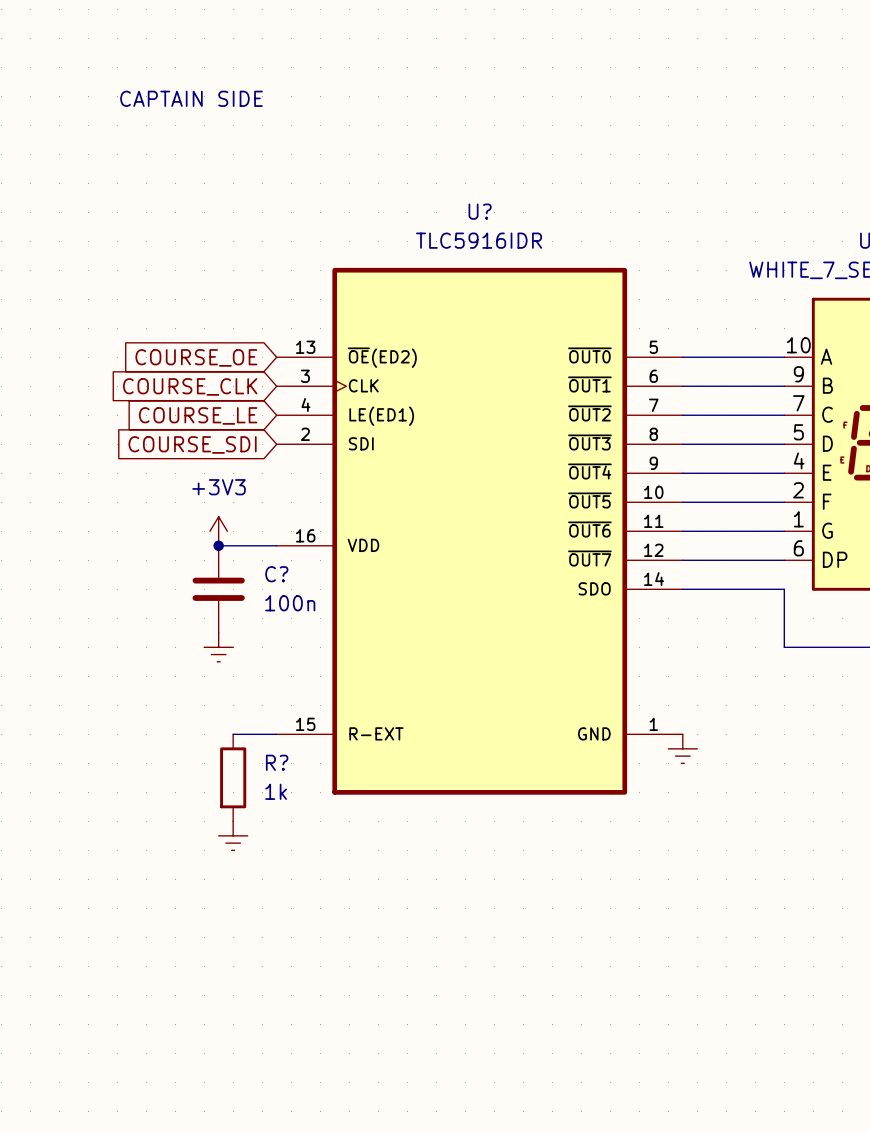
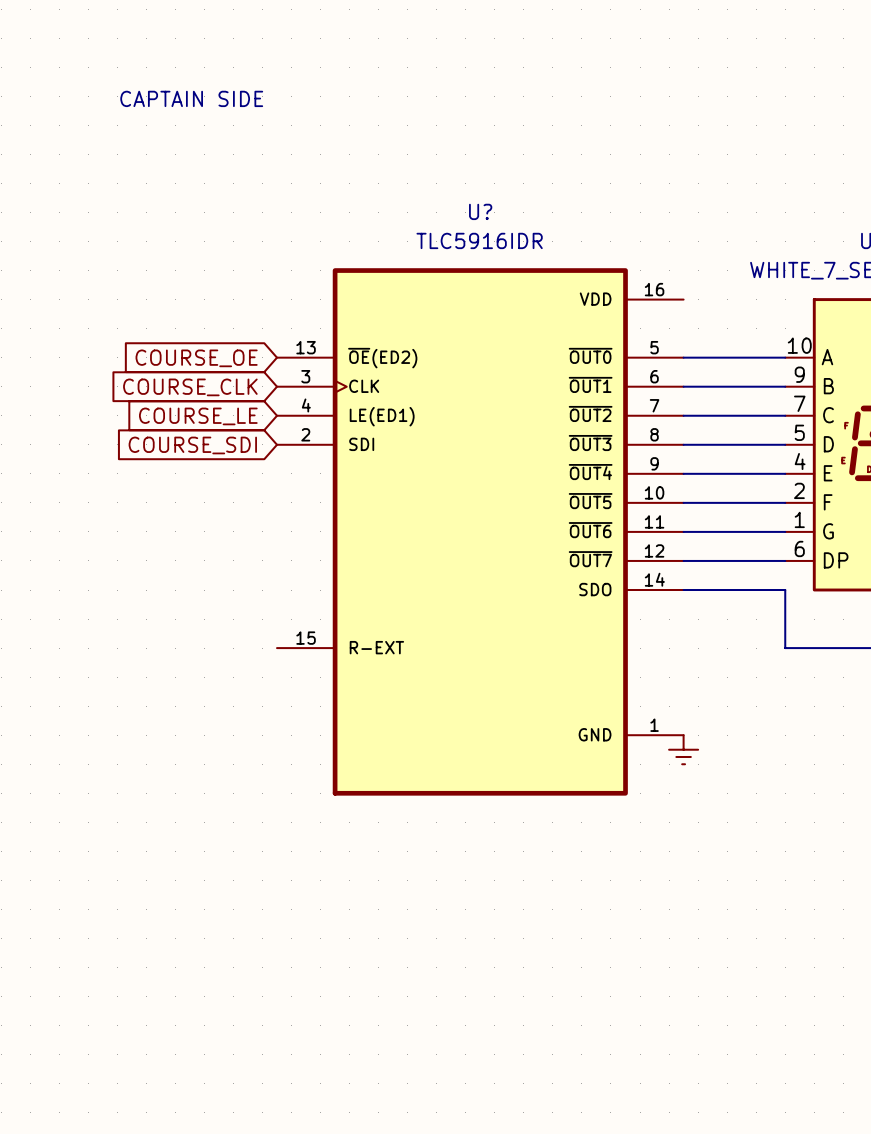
U? symbol: [276, 267, 683, 795] -> [277, 268, 684, 796]
power symbol: +3V3 (218, 531) -> none
wire: (218, 545) (276, 545) -> none
junction: (218, 545) -> none
C?: 100n (218, 589) -> none
power symbol: (218, 647) -> none
wire: (233, 734) (276, 734) -> none
R?: 1k (233, 777) -> none
power symbol: (233, 835) -> none

